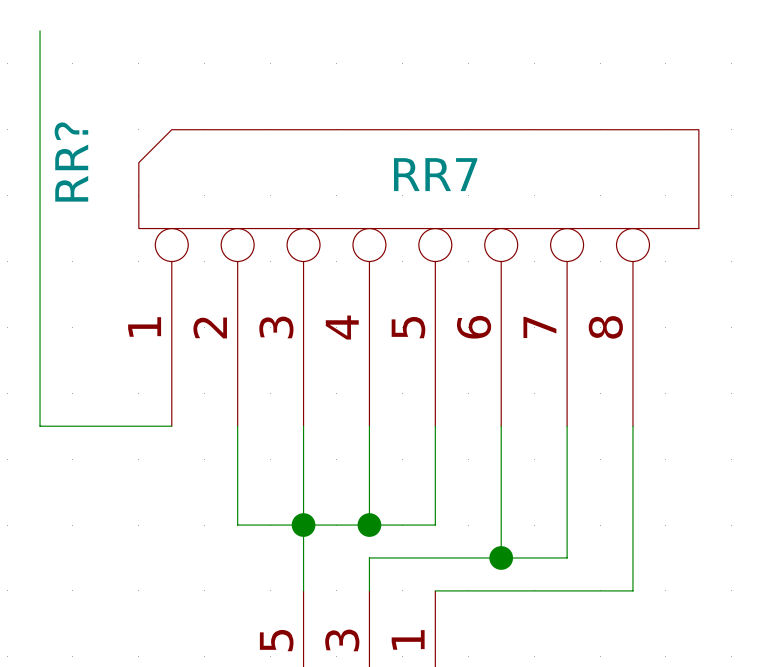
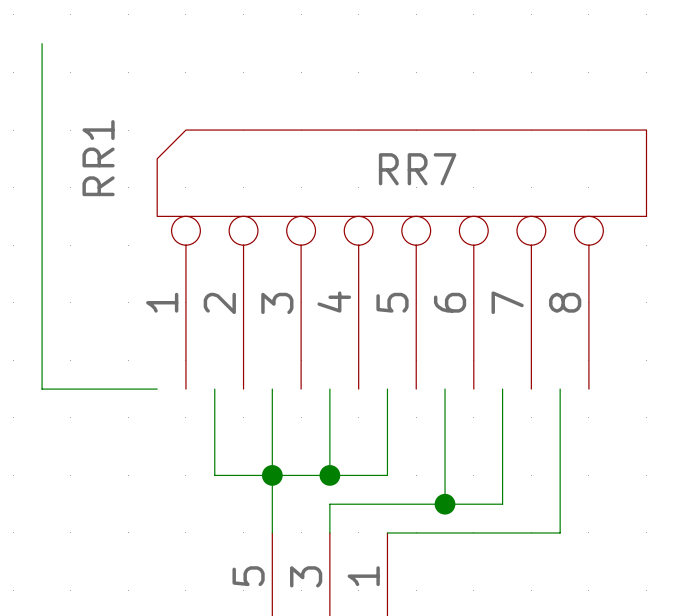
RR?: RR7 (418, 277) -> none
RR1: none -> RR7 (401, 259)

